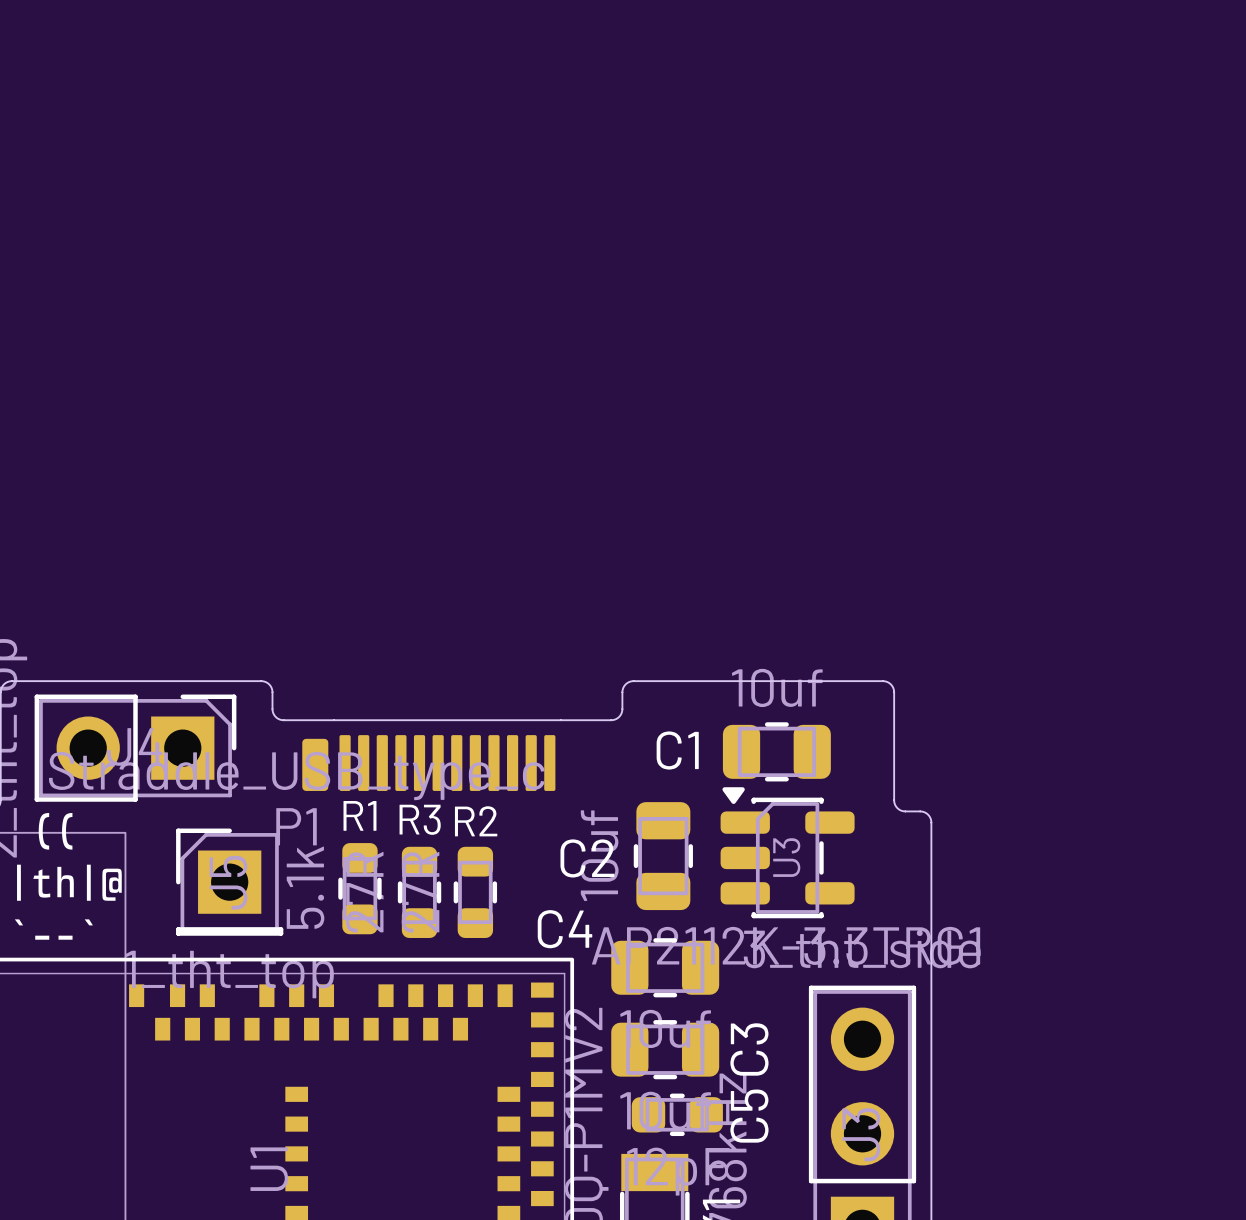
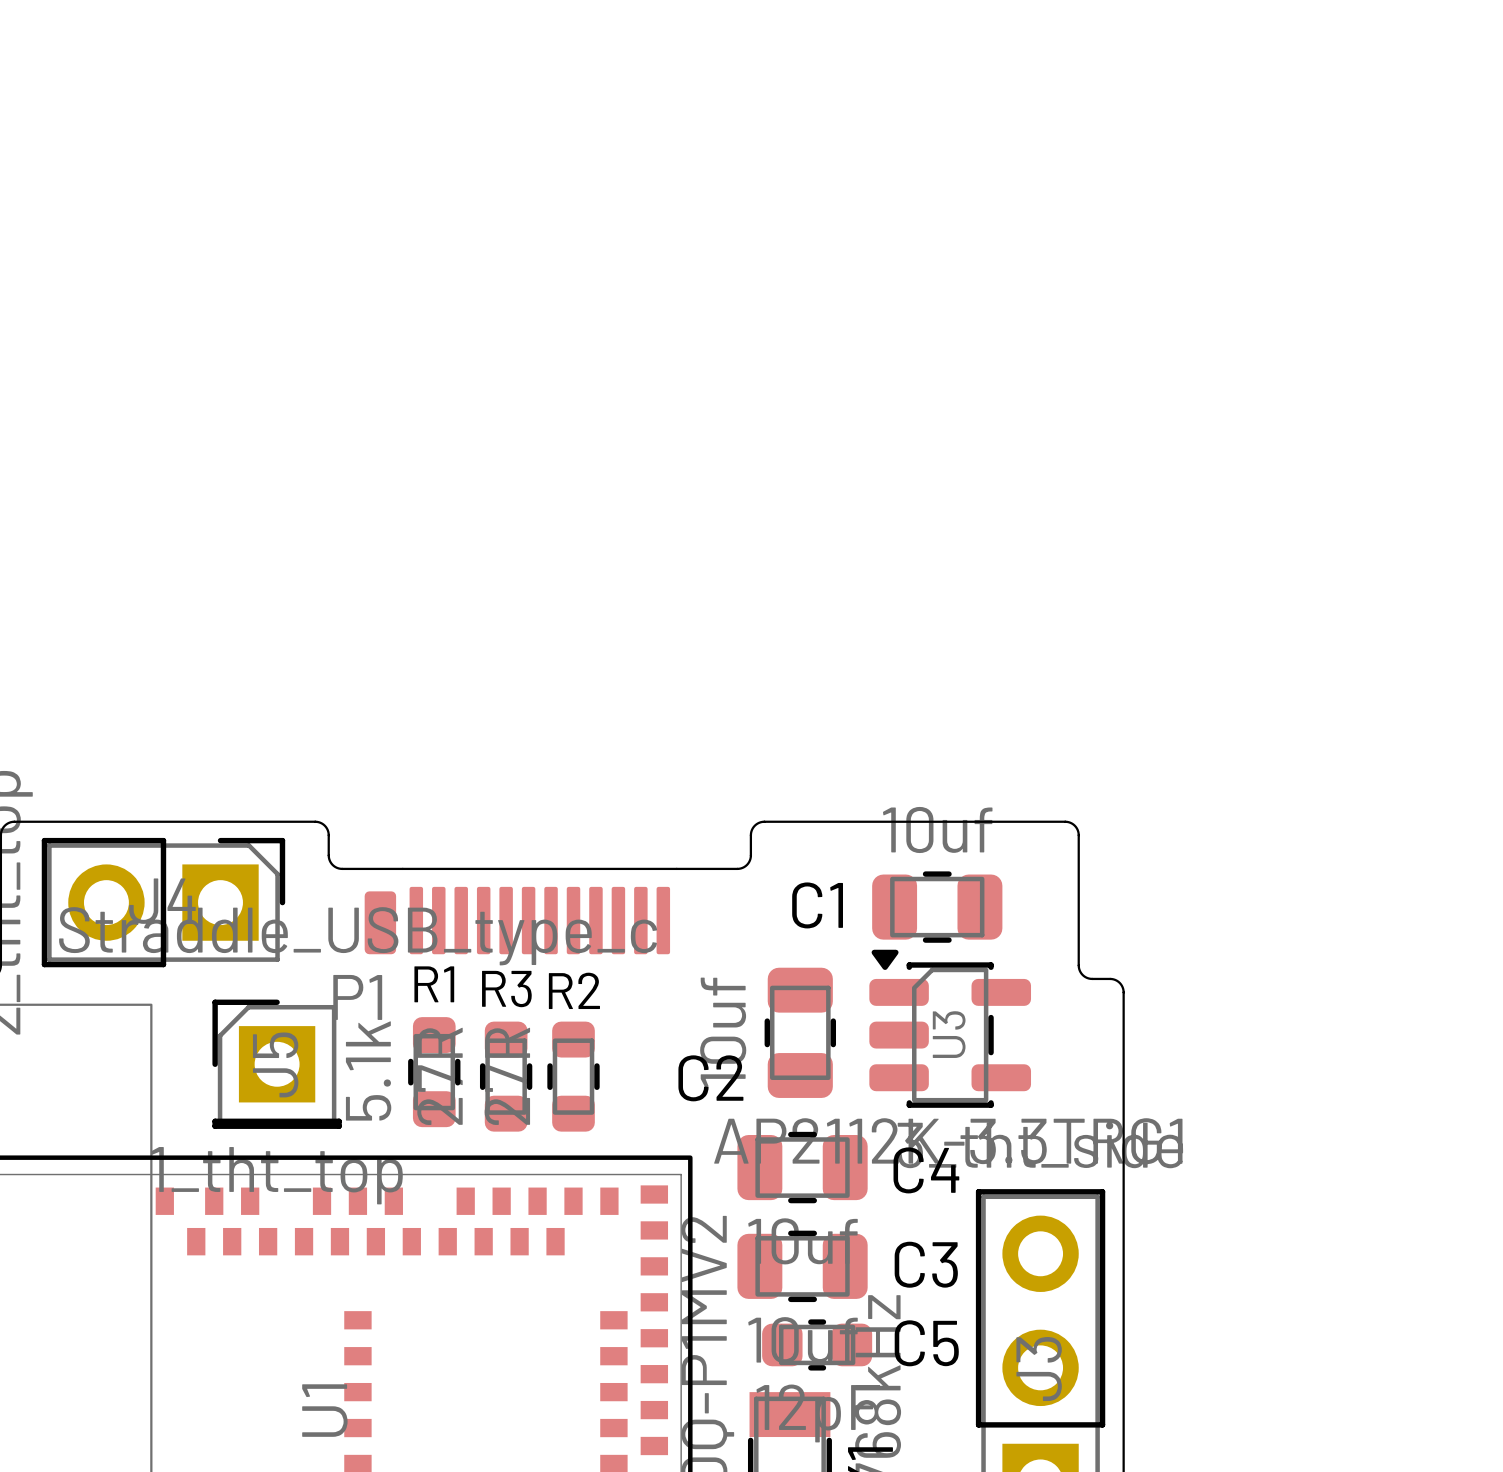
drawing: [14, 812, 122, 940] -> none
C2 name position: C2 (587, 858) -> C2 (710, 1078)
C4 name position: C4 (565, 929) -> C4 (926, 1170)
C3 name rotation: 0° (749, 1049) -> 90° clockwise (926, 1264)
C5 name rotation: 0° (749, 1116) -> 90° clockwise (926, 1343)

